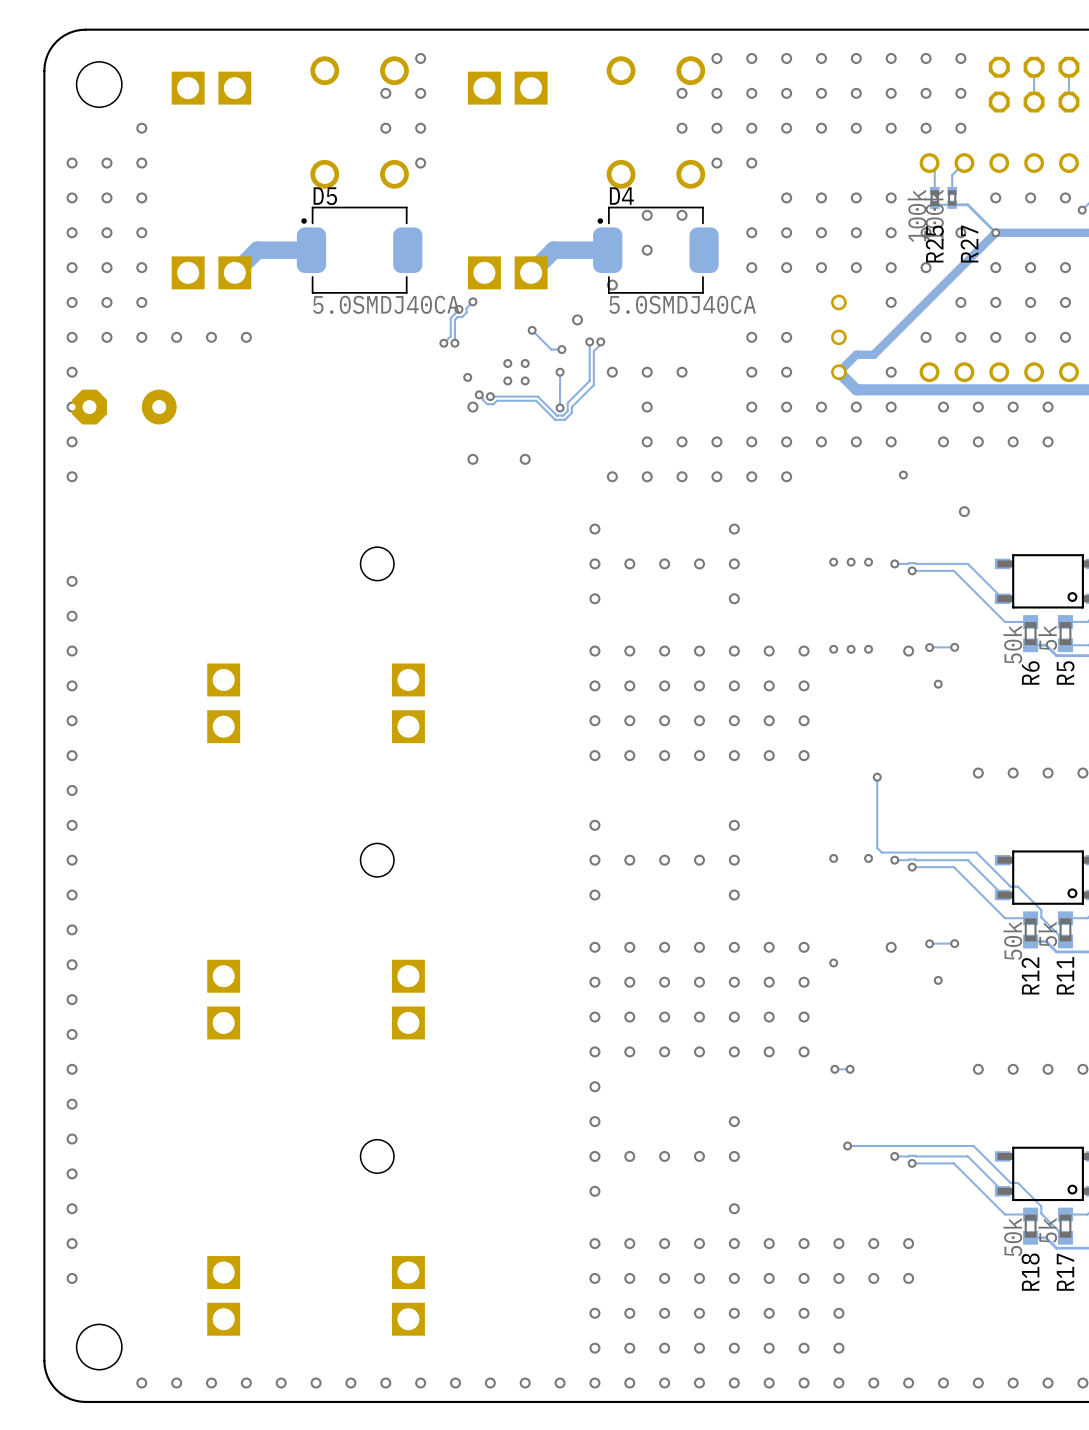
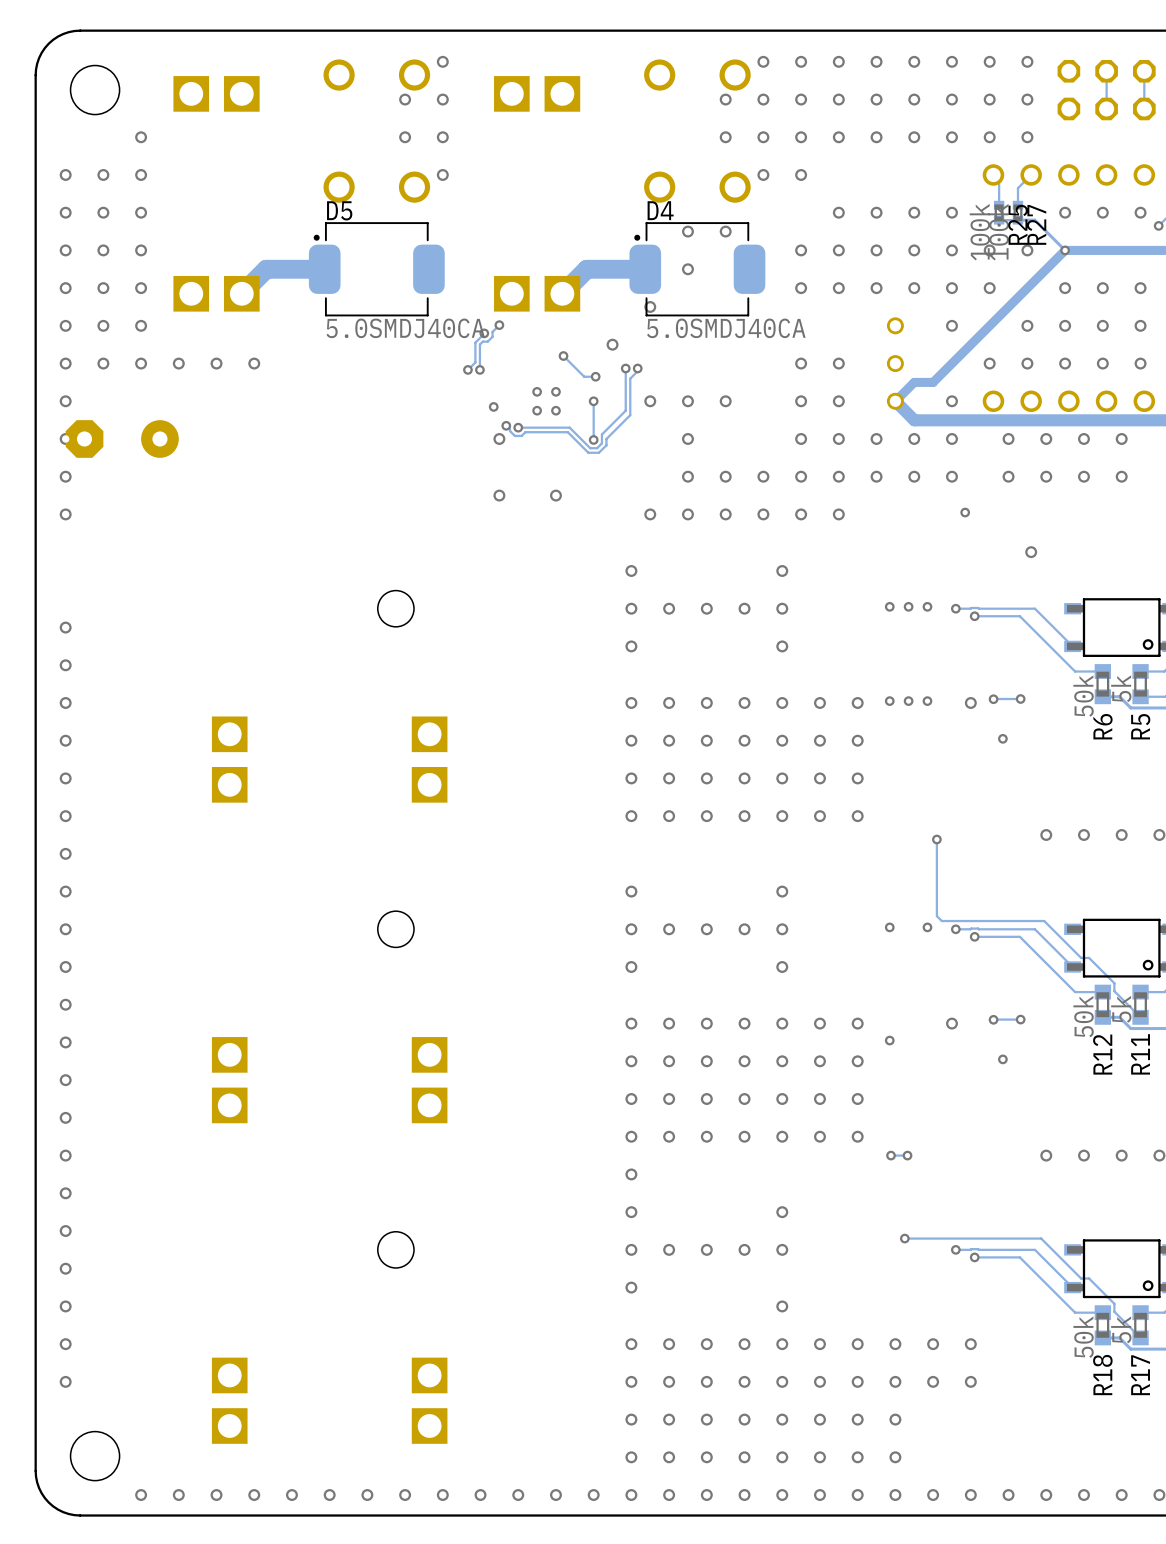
R25 name position: R25 (934, 244) -> R25 (1017, 224)
R27 name position: R27 (969, 244) -> R27 (1036, 224)

